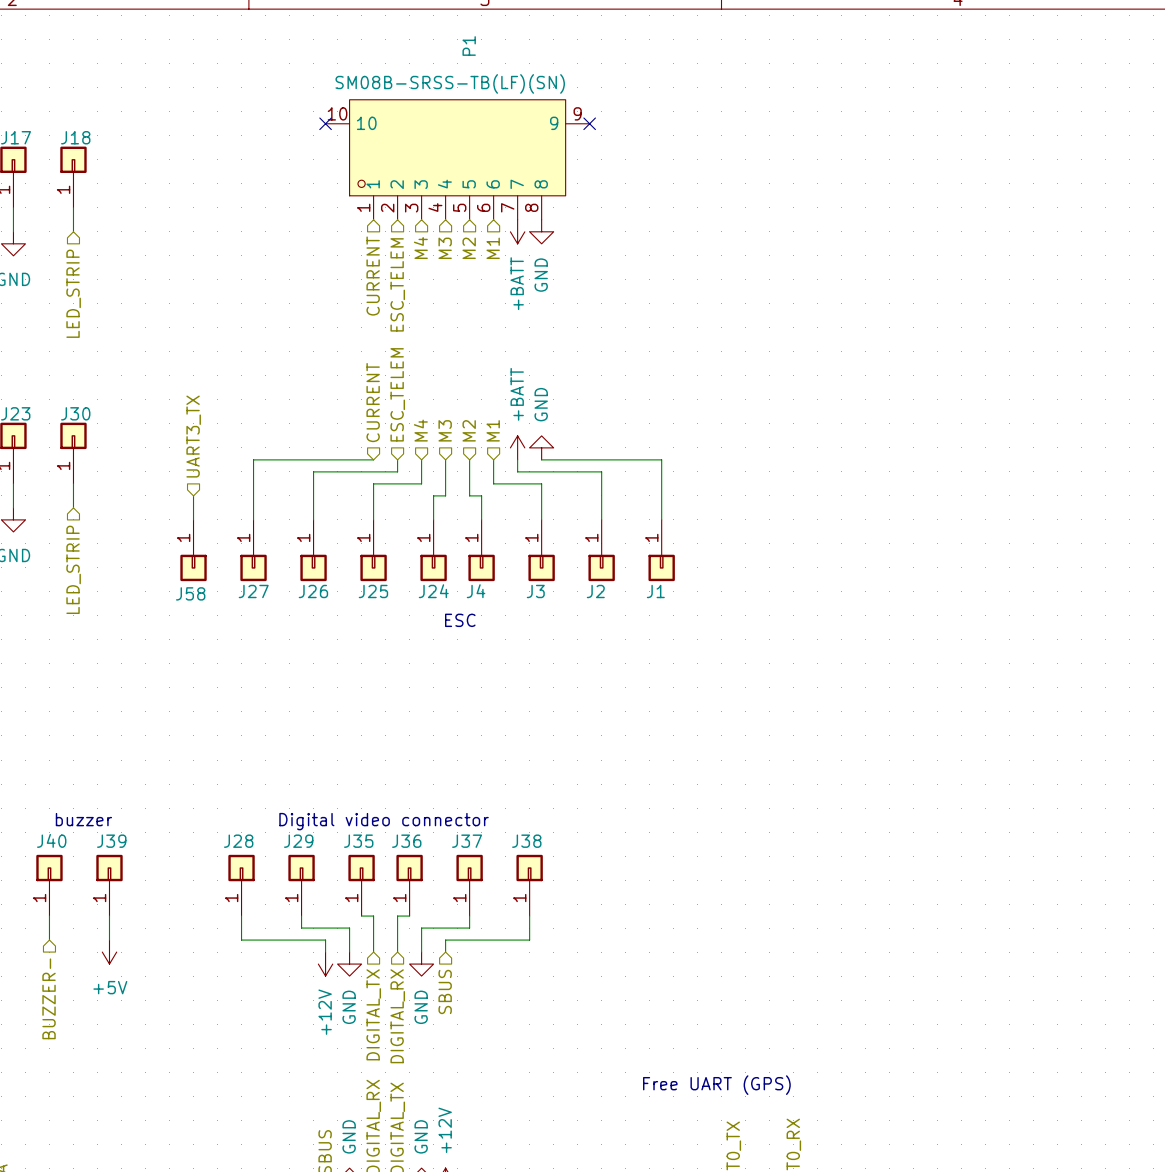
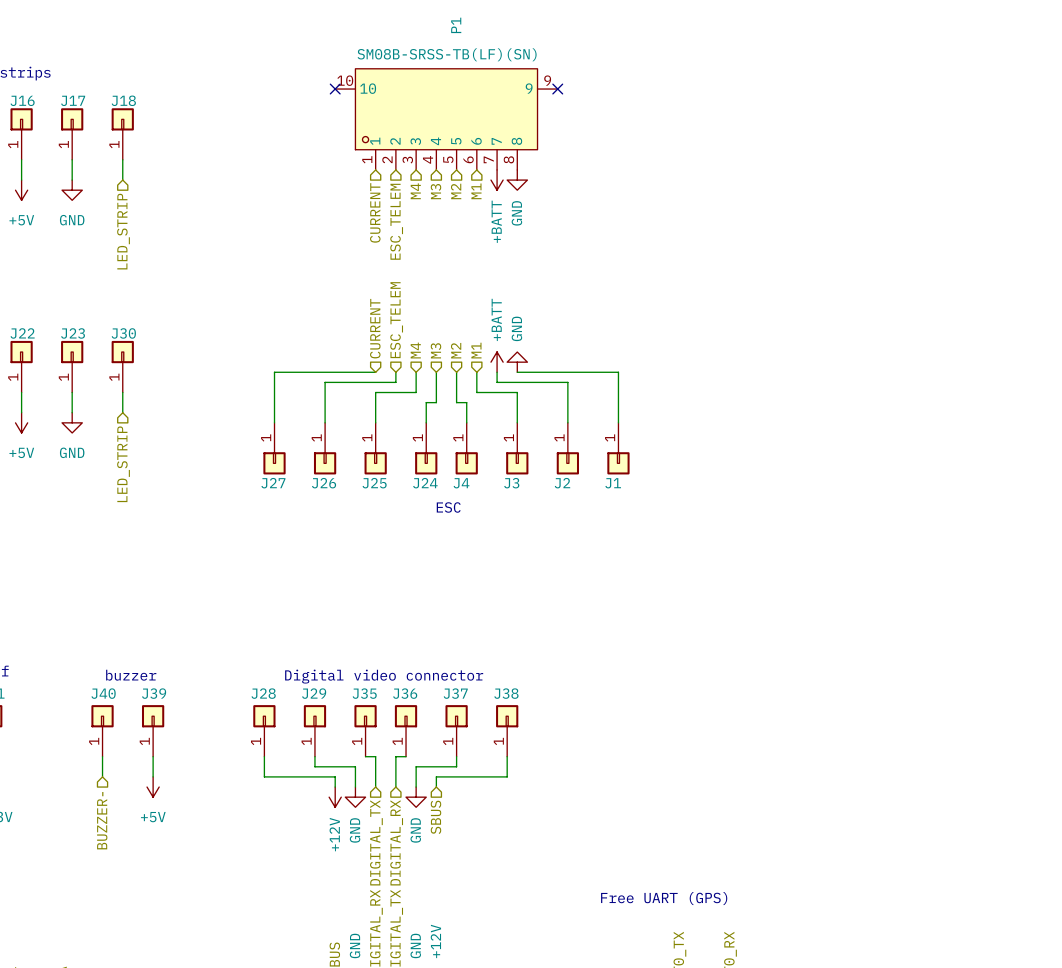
hierarchical label: UART3_TX (193, 436) -> none
wire: (193, 495) (193, 519) -> none
J58: (193, 550) -> none

